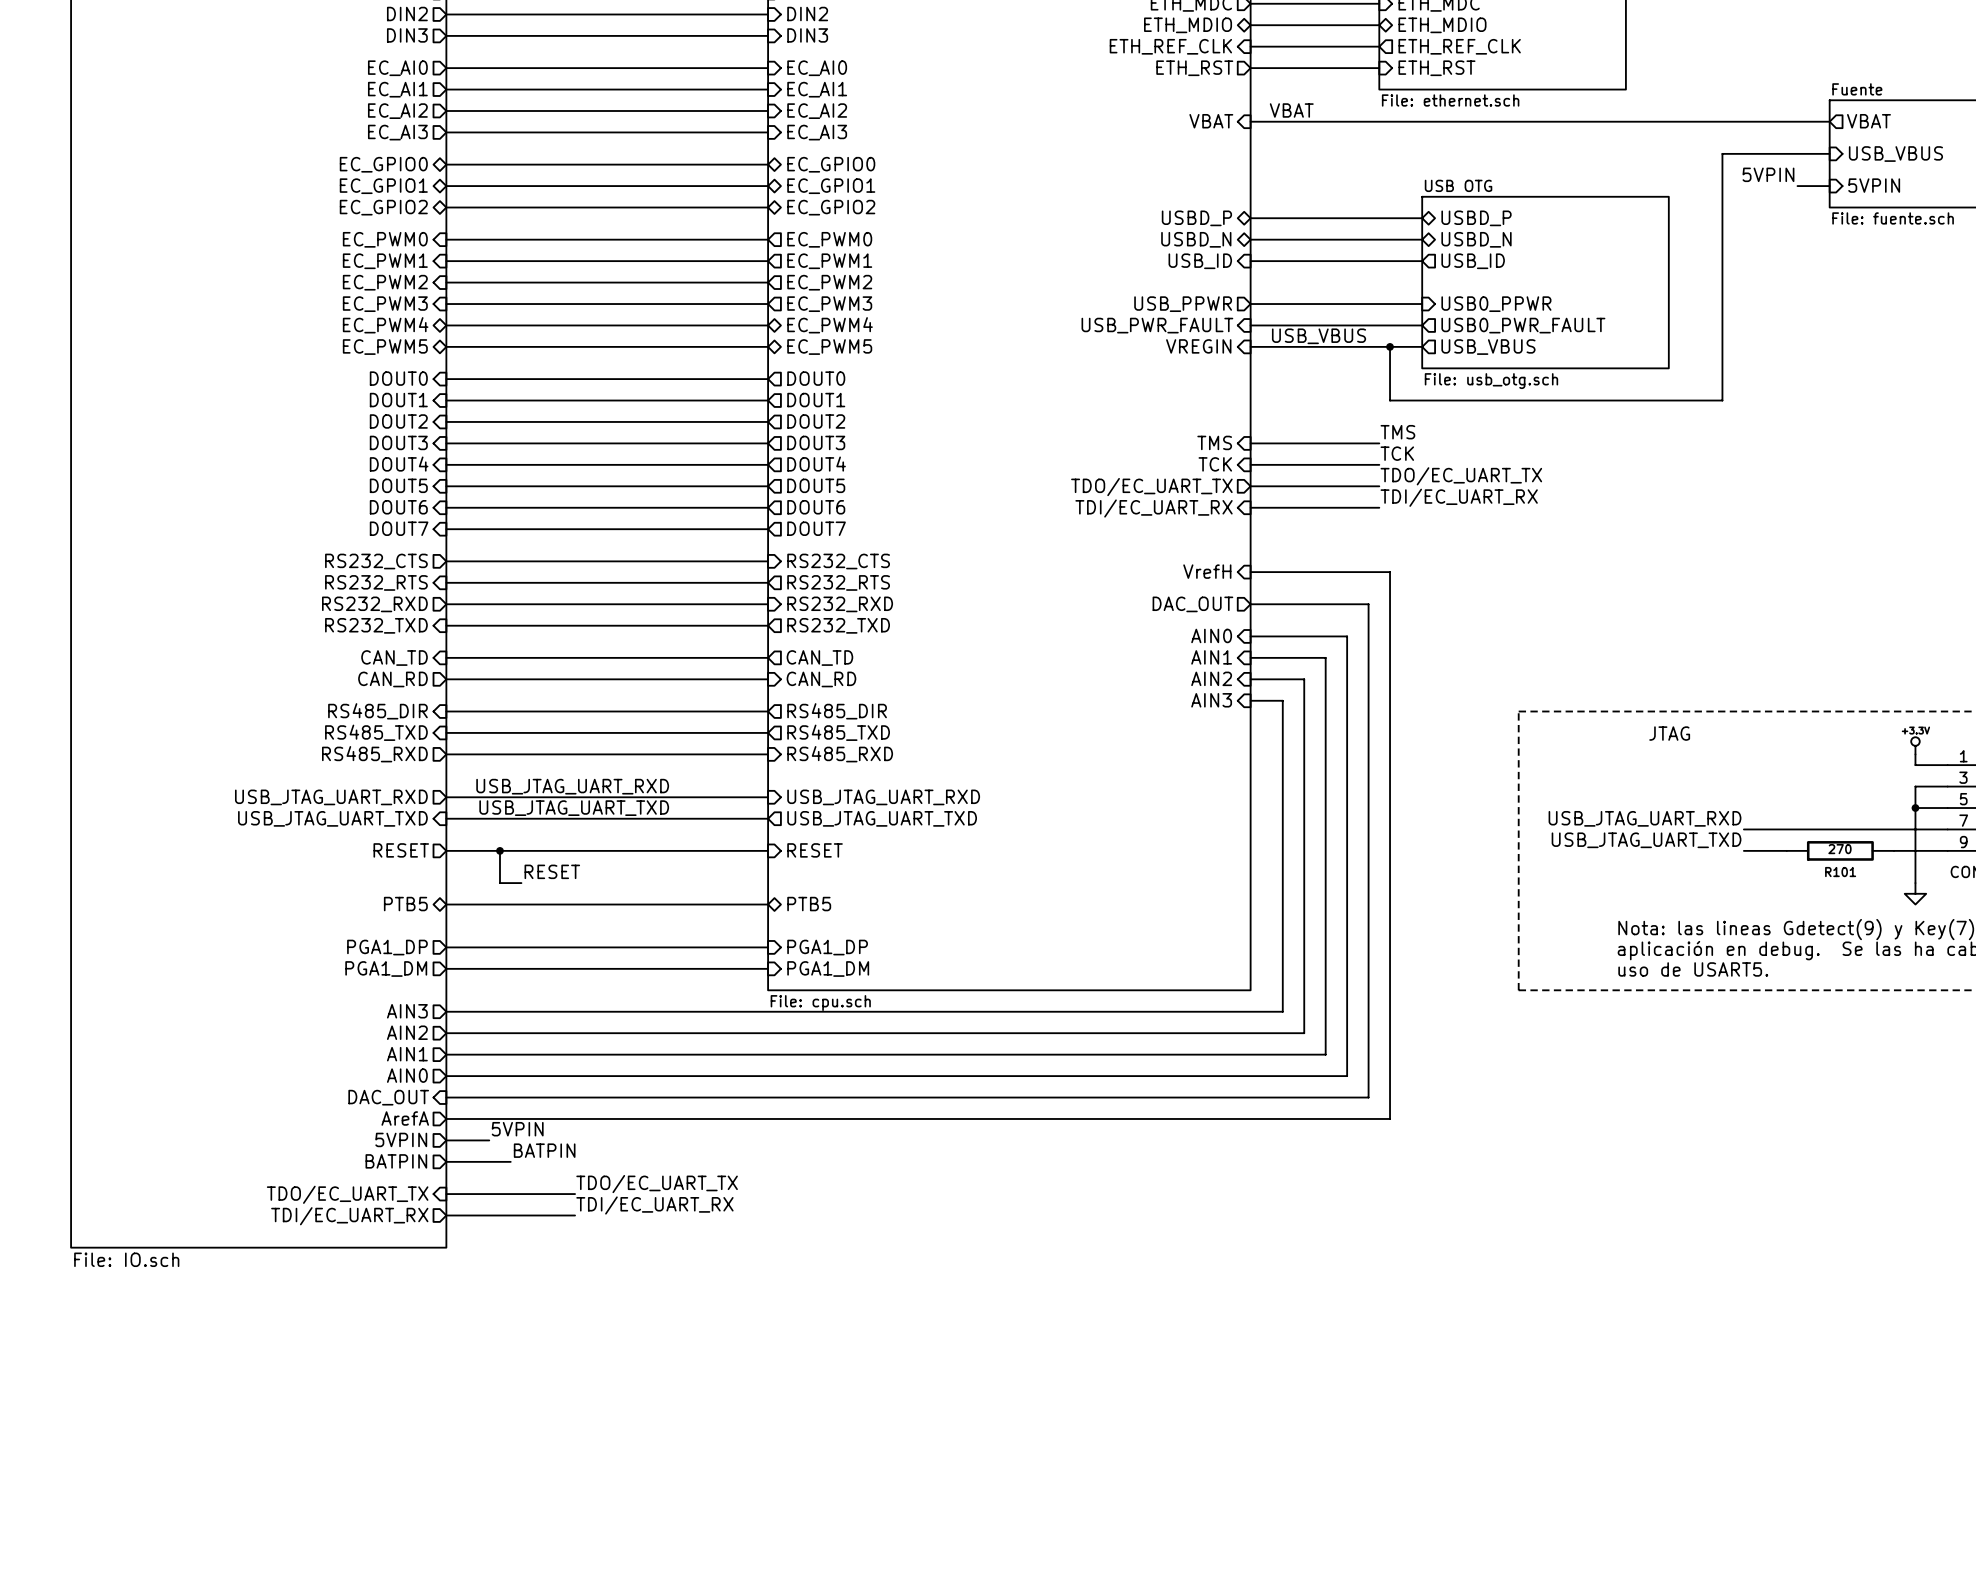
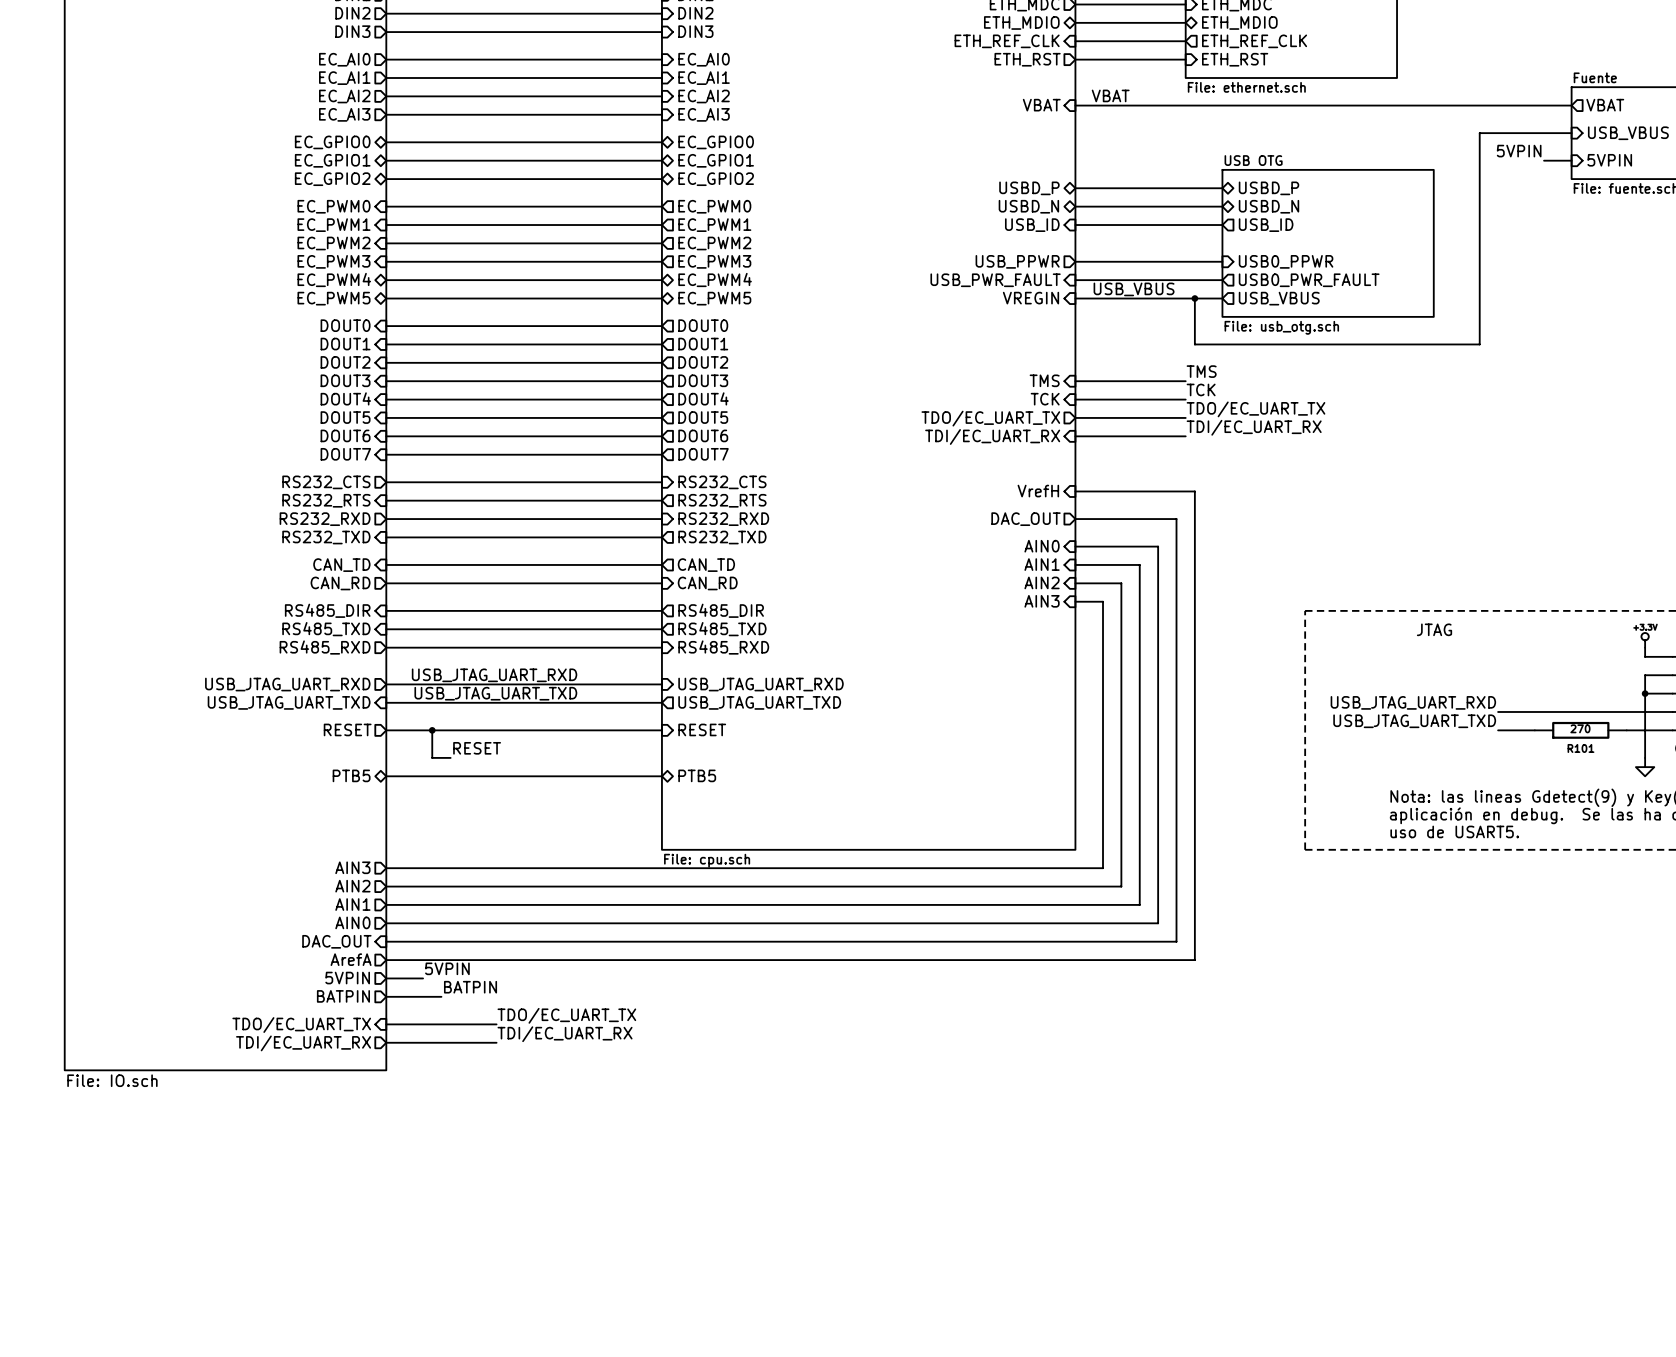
sheet pin: PGA1_DP (387, 947) -> none
wire: (446, 947) (768, 947) -> none
sheet pin: PGA1_DP (827, 947) -> none
sheet pin: PGA1_DM (386, 968) -> none
wire: (446, 968) (768, 968) -> none
sheet pin: PGA1_DM (828, 968) -> none

